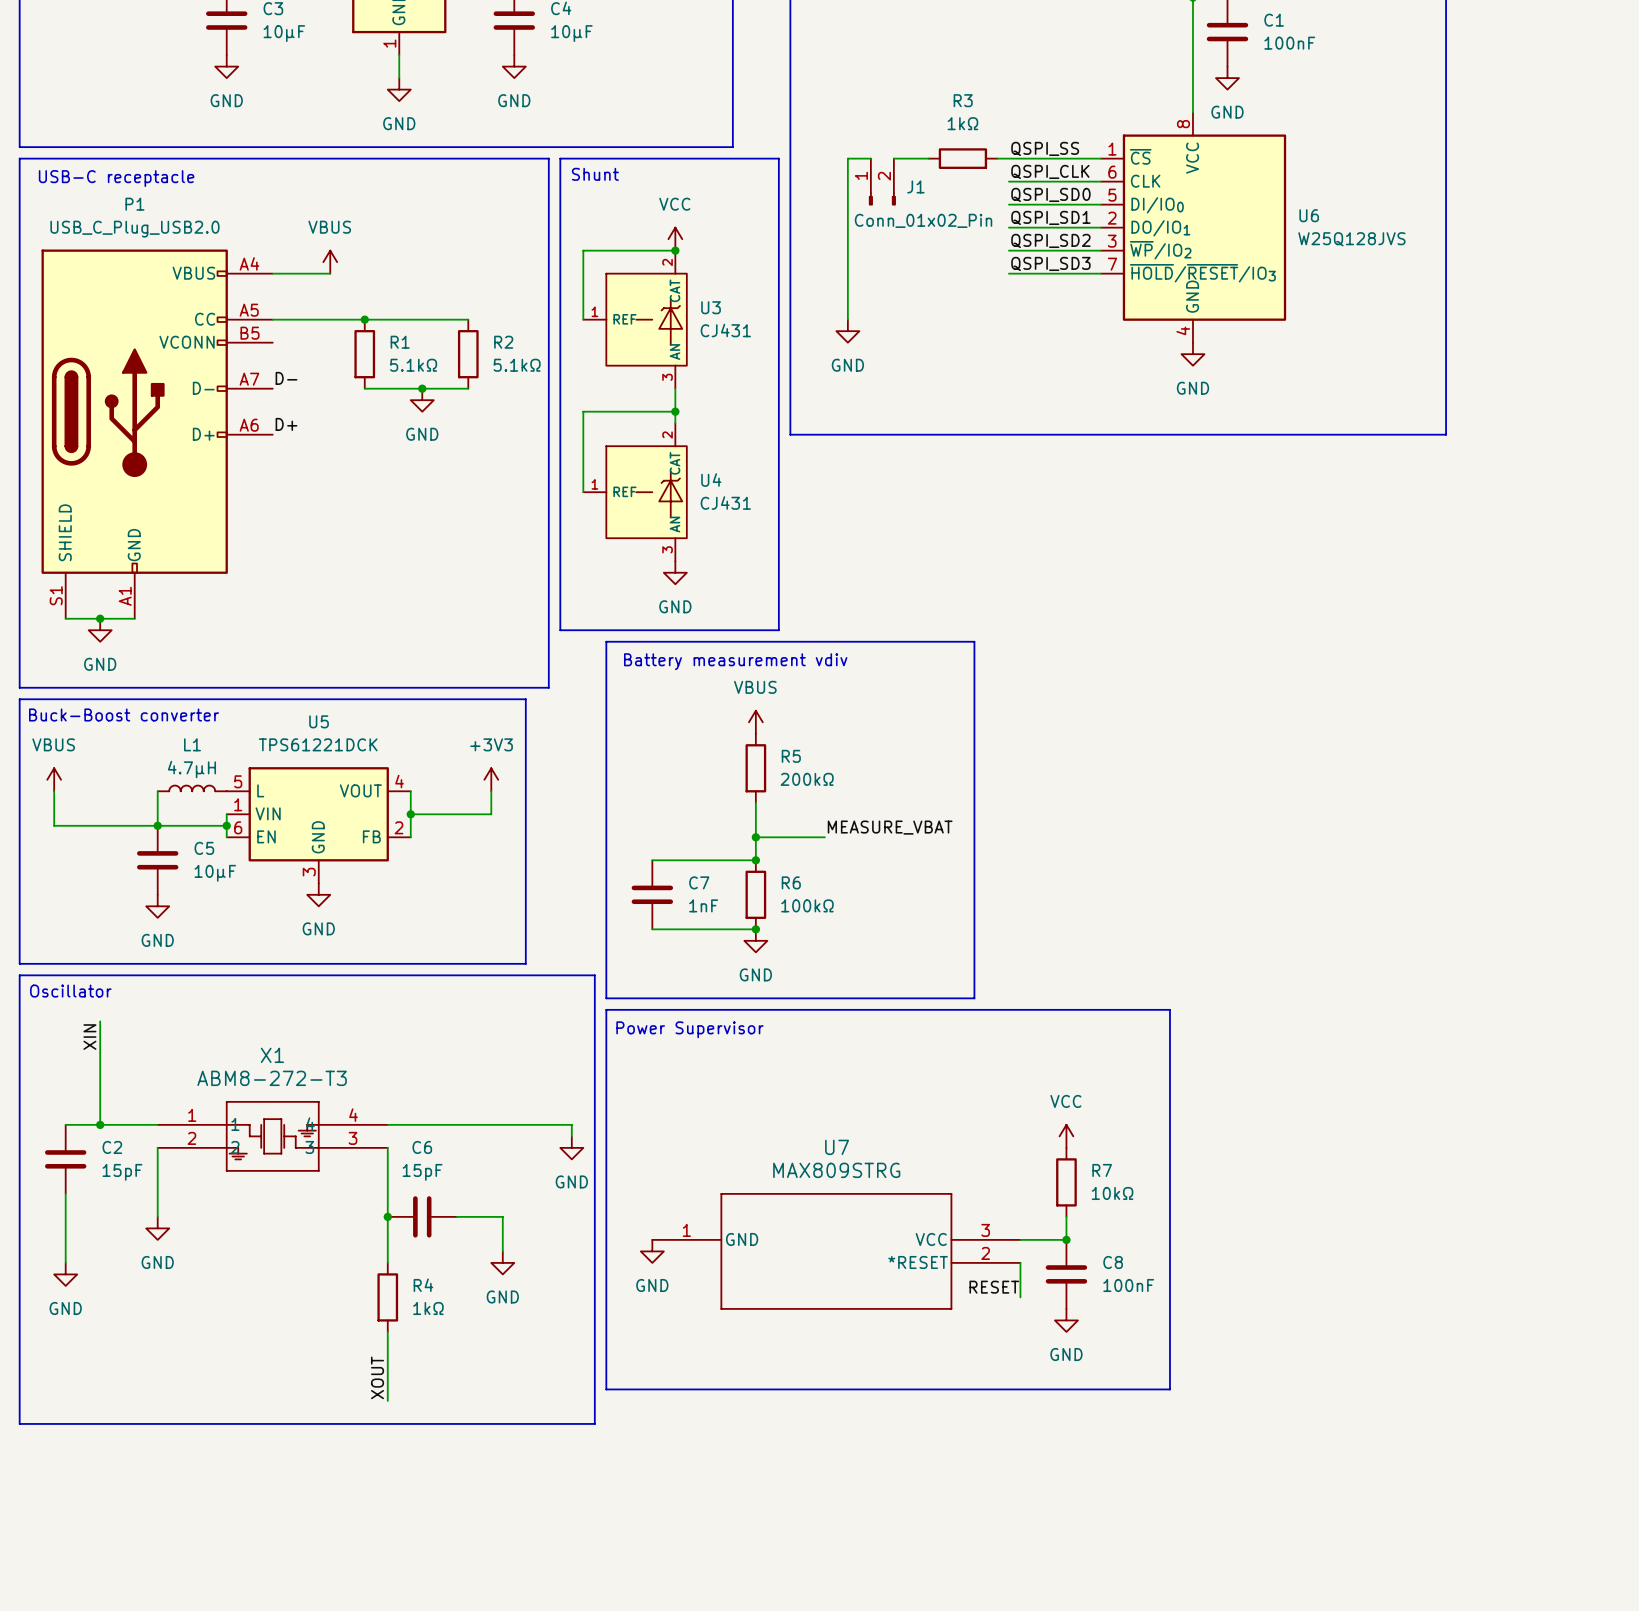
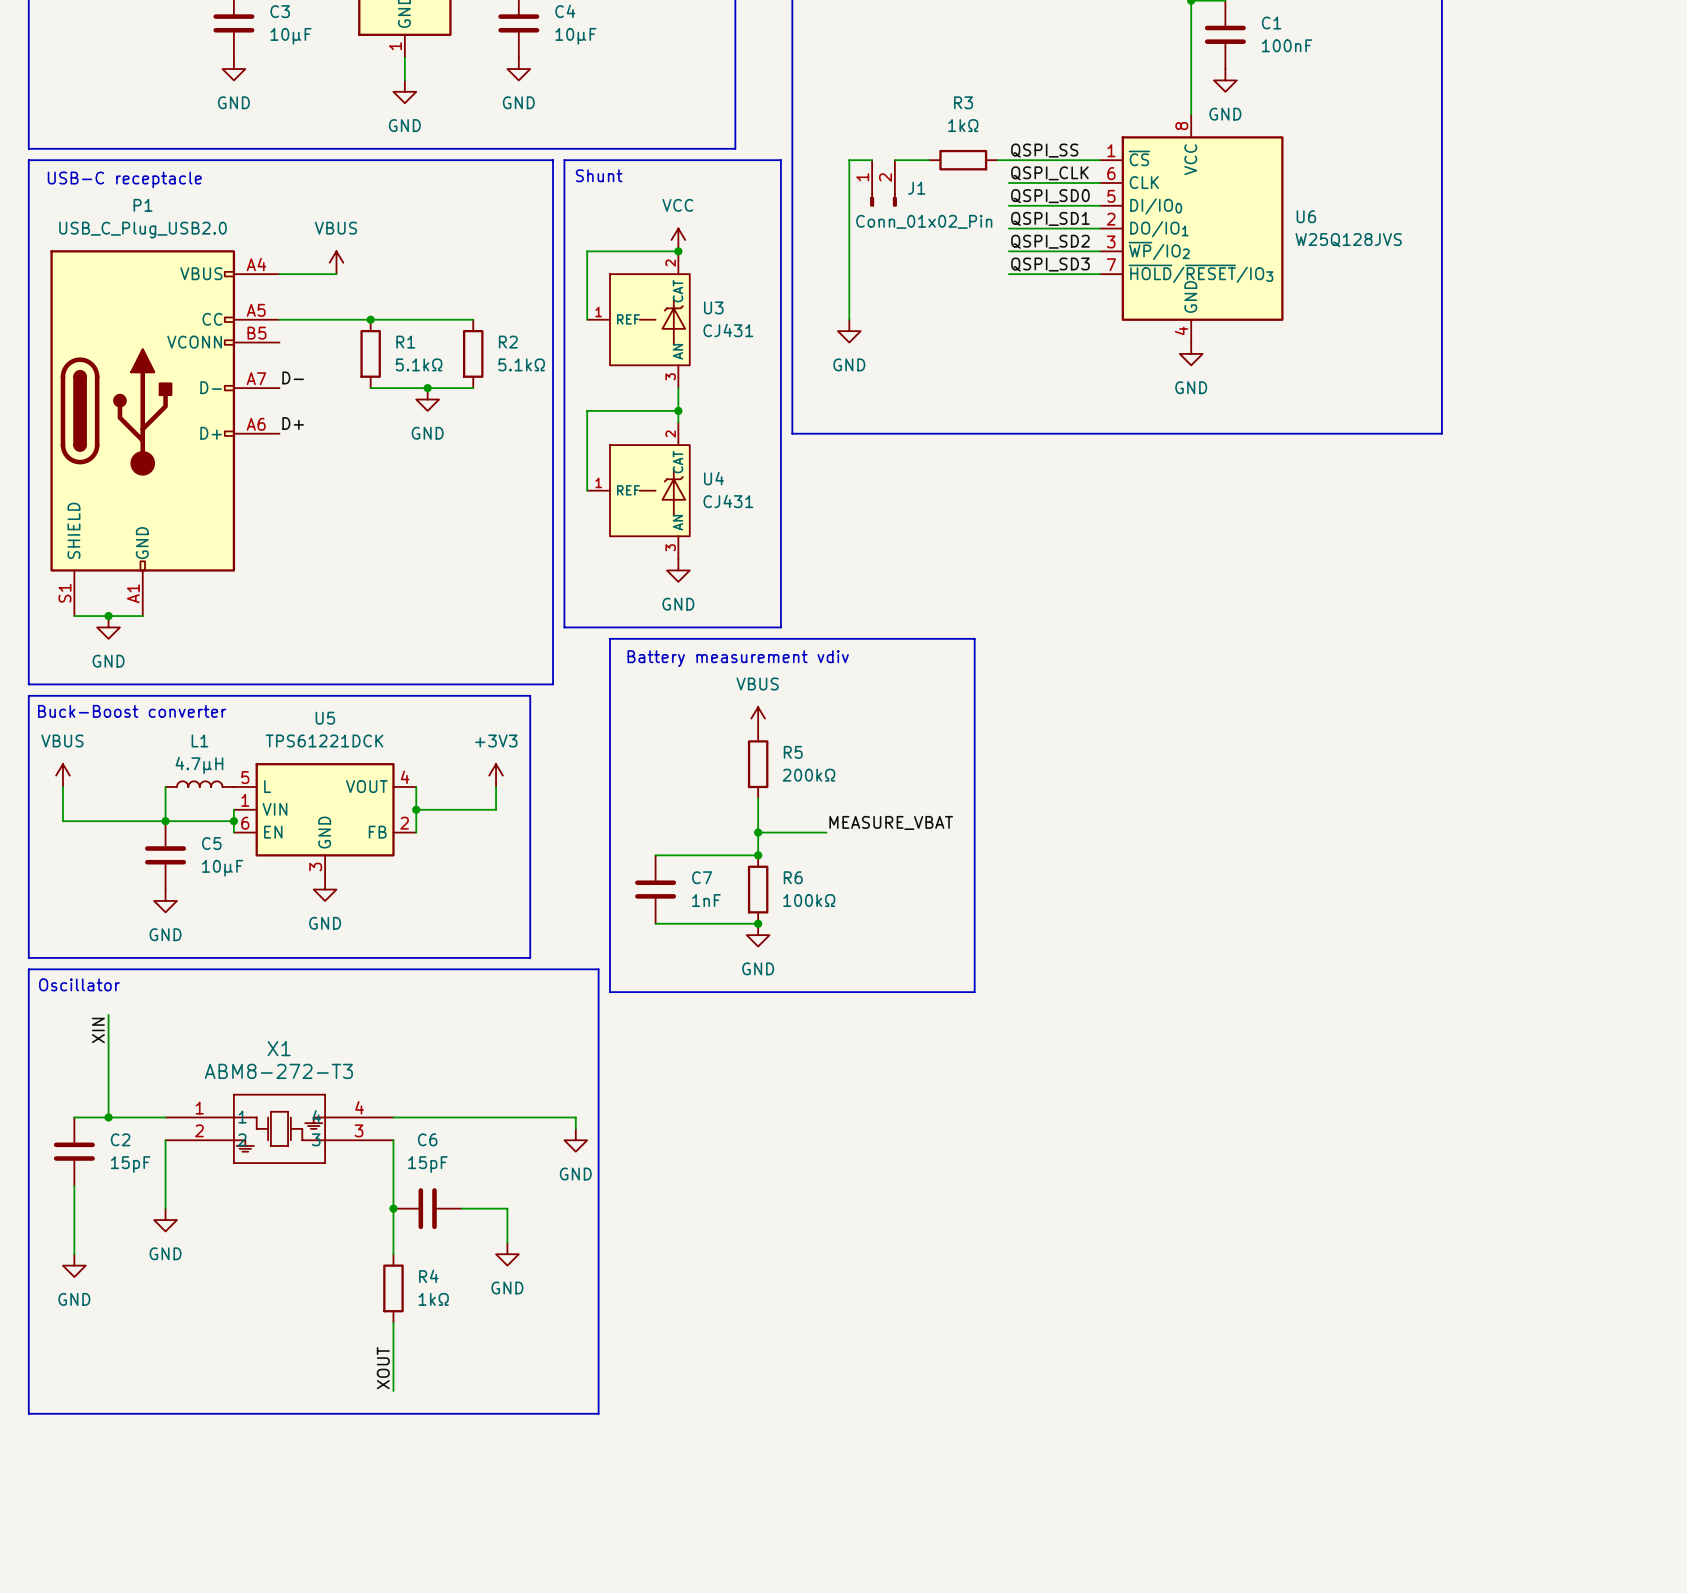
line: (606, 1009) (1169, 1009) (1169, 1389) (606, 1389) (606, 1009) -> none
text: Power Supervisor (689, 1029) -> none
power symbol: VCC (1066, 1136) -> none
R7: 10kΩ (1066, 1182) -> none
wire: (1066, 1216) (1066, 1239) (1020, 1239) -> none
junction: (1066, 1239) -> none
power symbol: GND (652, 1251) -> none
U7: MAX809STRG (836, 1251) -> none
wire: (1020, 1262) (1020, 1297) -> none
C8: 100nF (1066, 1274) -> none
label: RESET (994, 1287) -> none
power symbol: GND (1066, 1320) -> none

